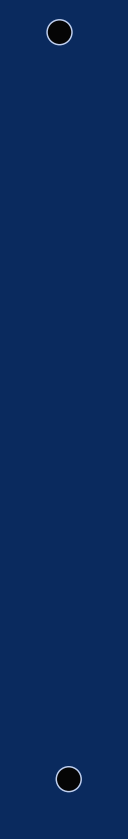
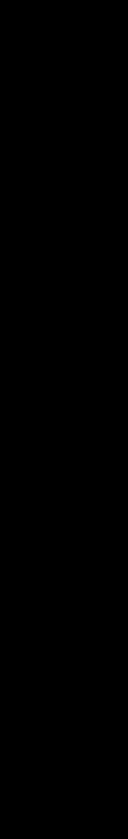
part: (59, 32) -> none
part: (68, 779) -> none

